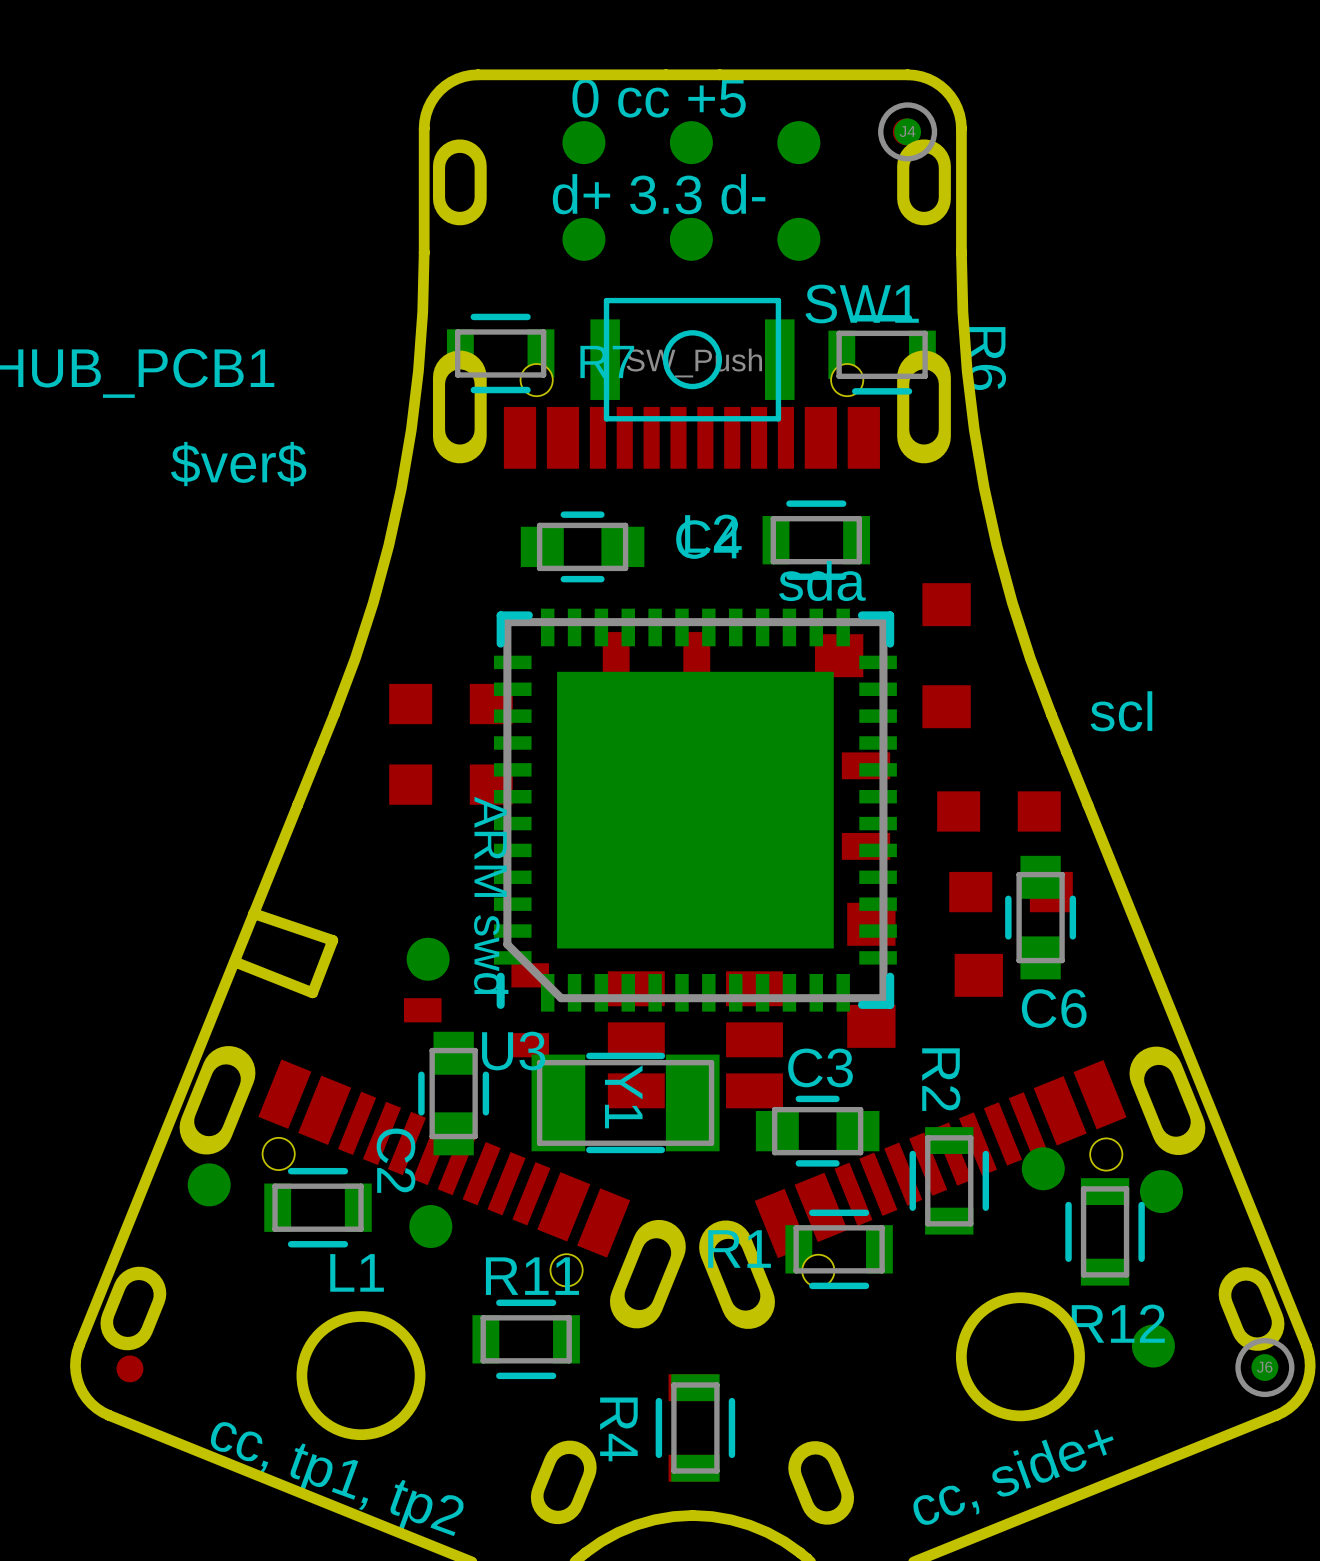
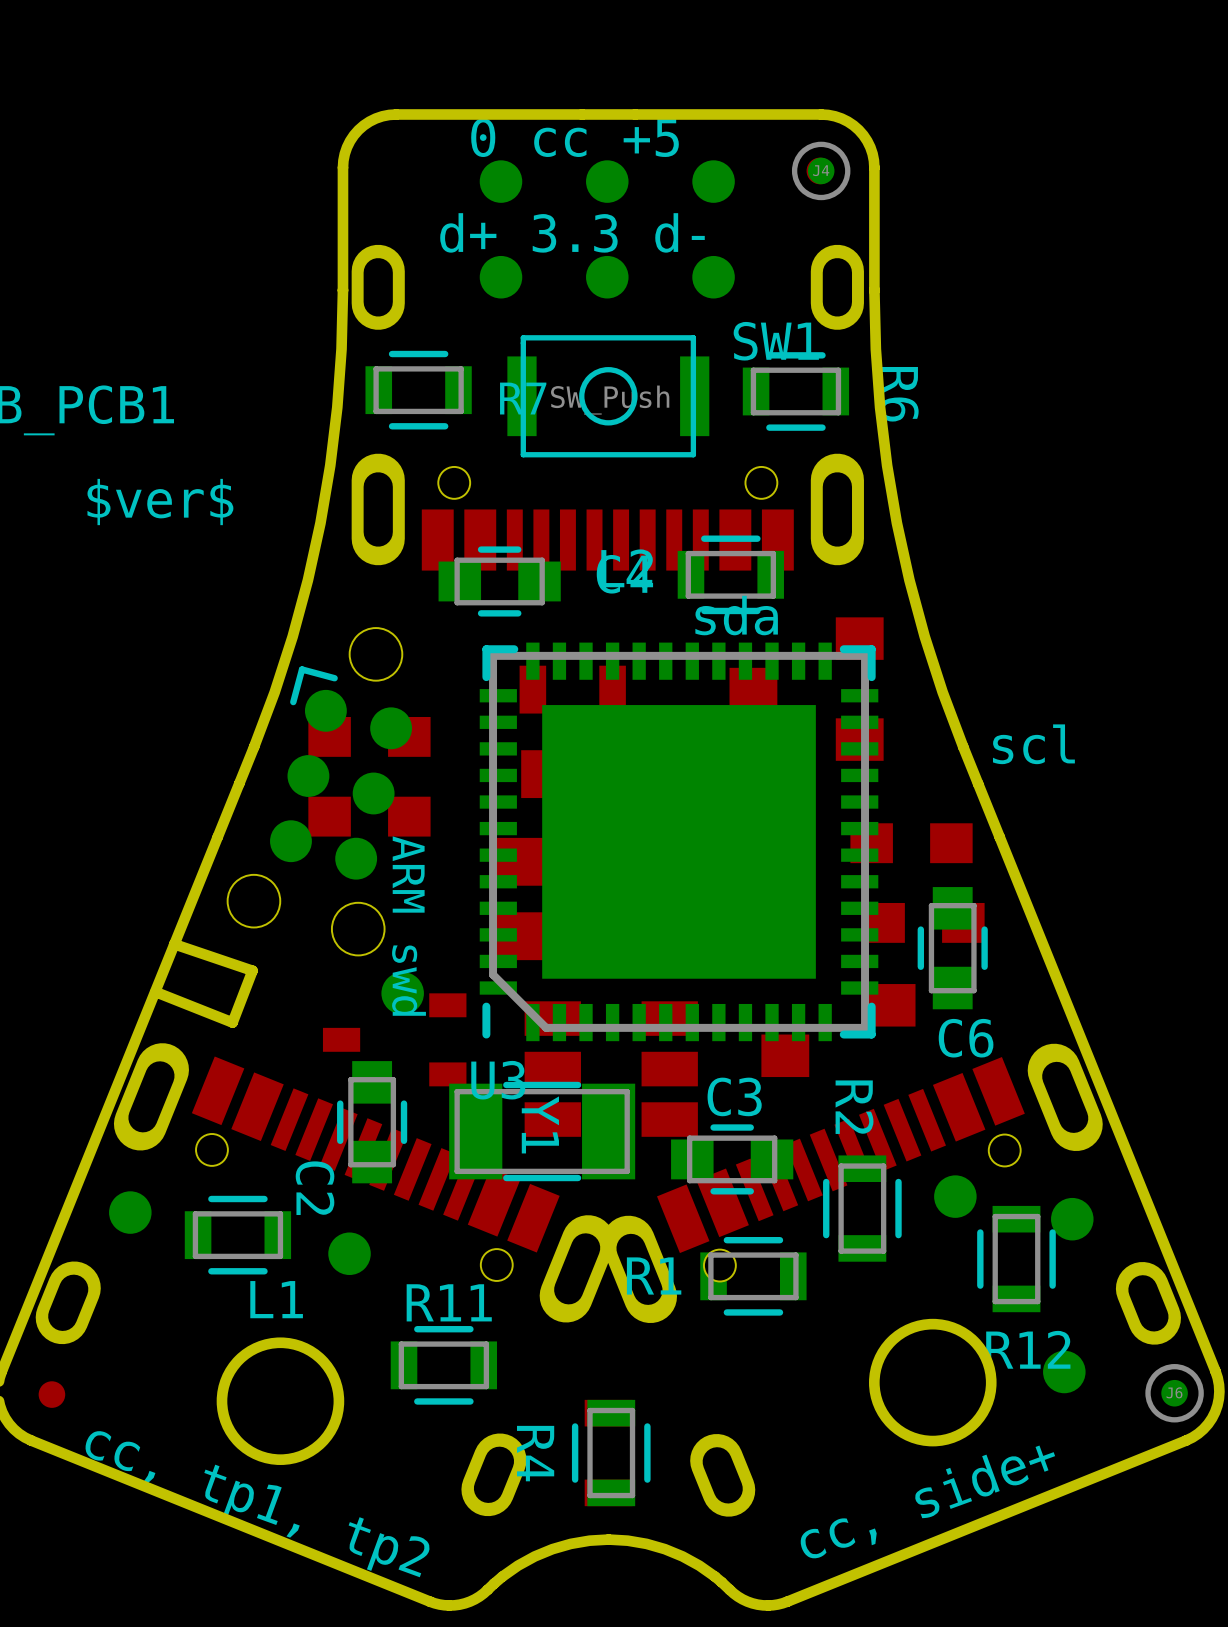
part position: (691, 304) -> (607, 407)
part: none -> (319, 791)
U3 position: (695, 810) -> (679, 841)
part position: (428, 959) -> (402, 993)
part position: (393, 1285) -> (325, 1279)
part position: (991, 1285) -> (891, 1280)

